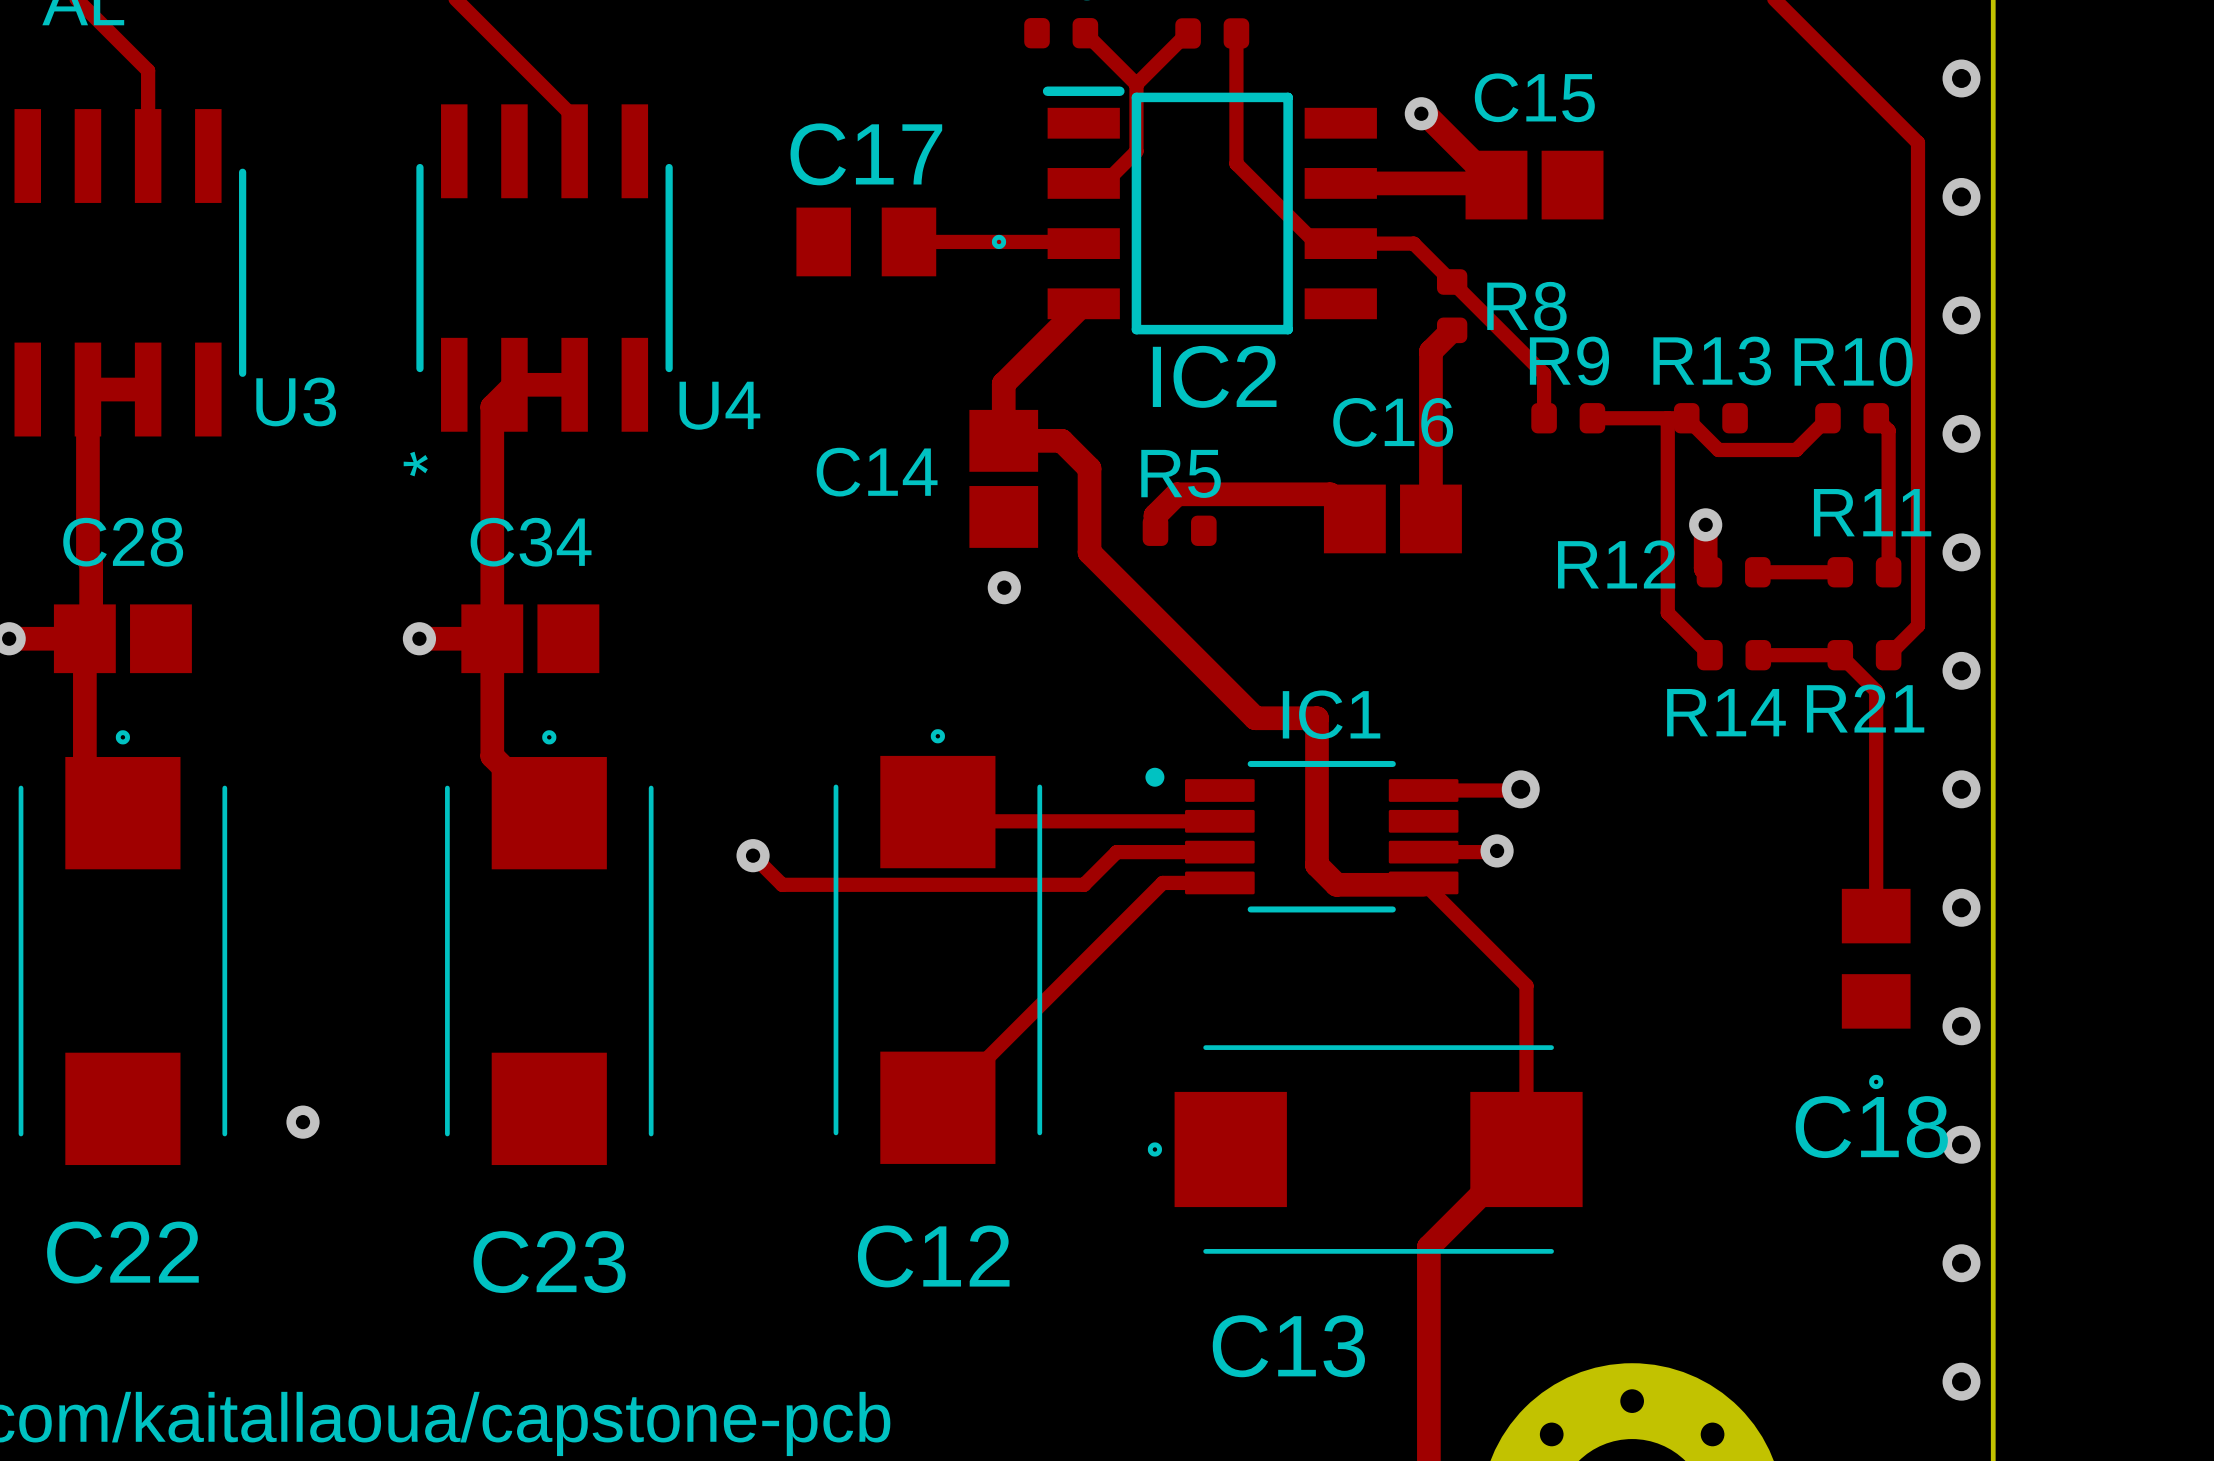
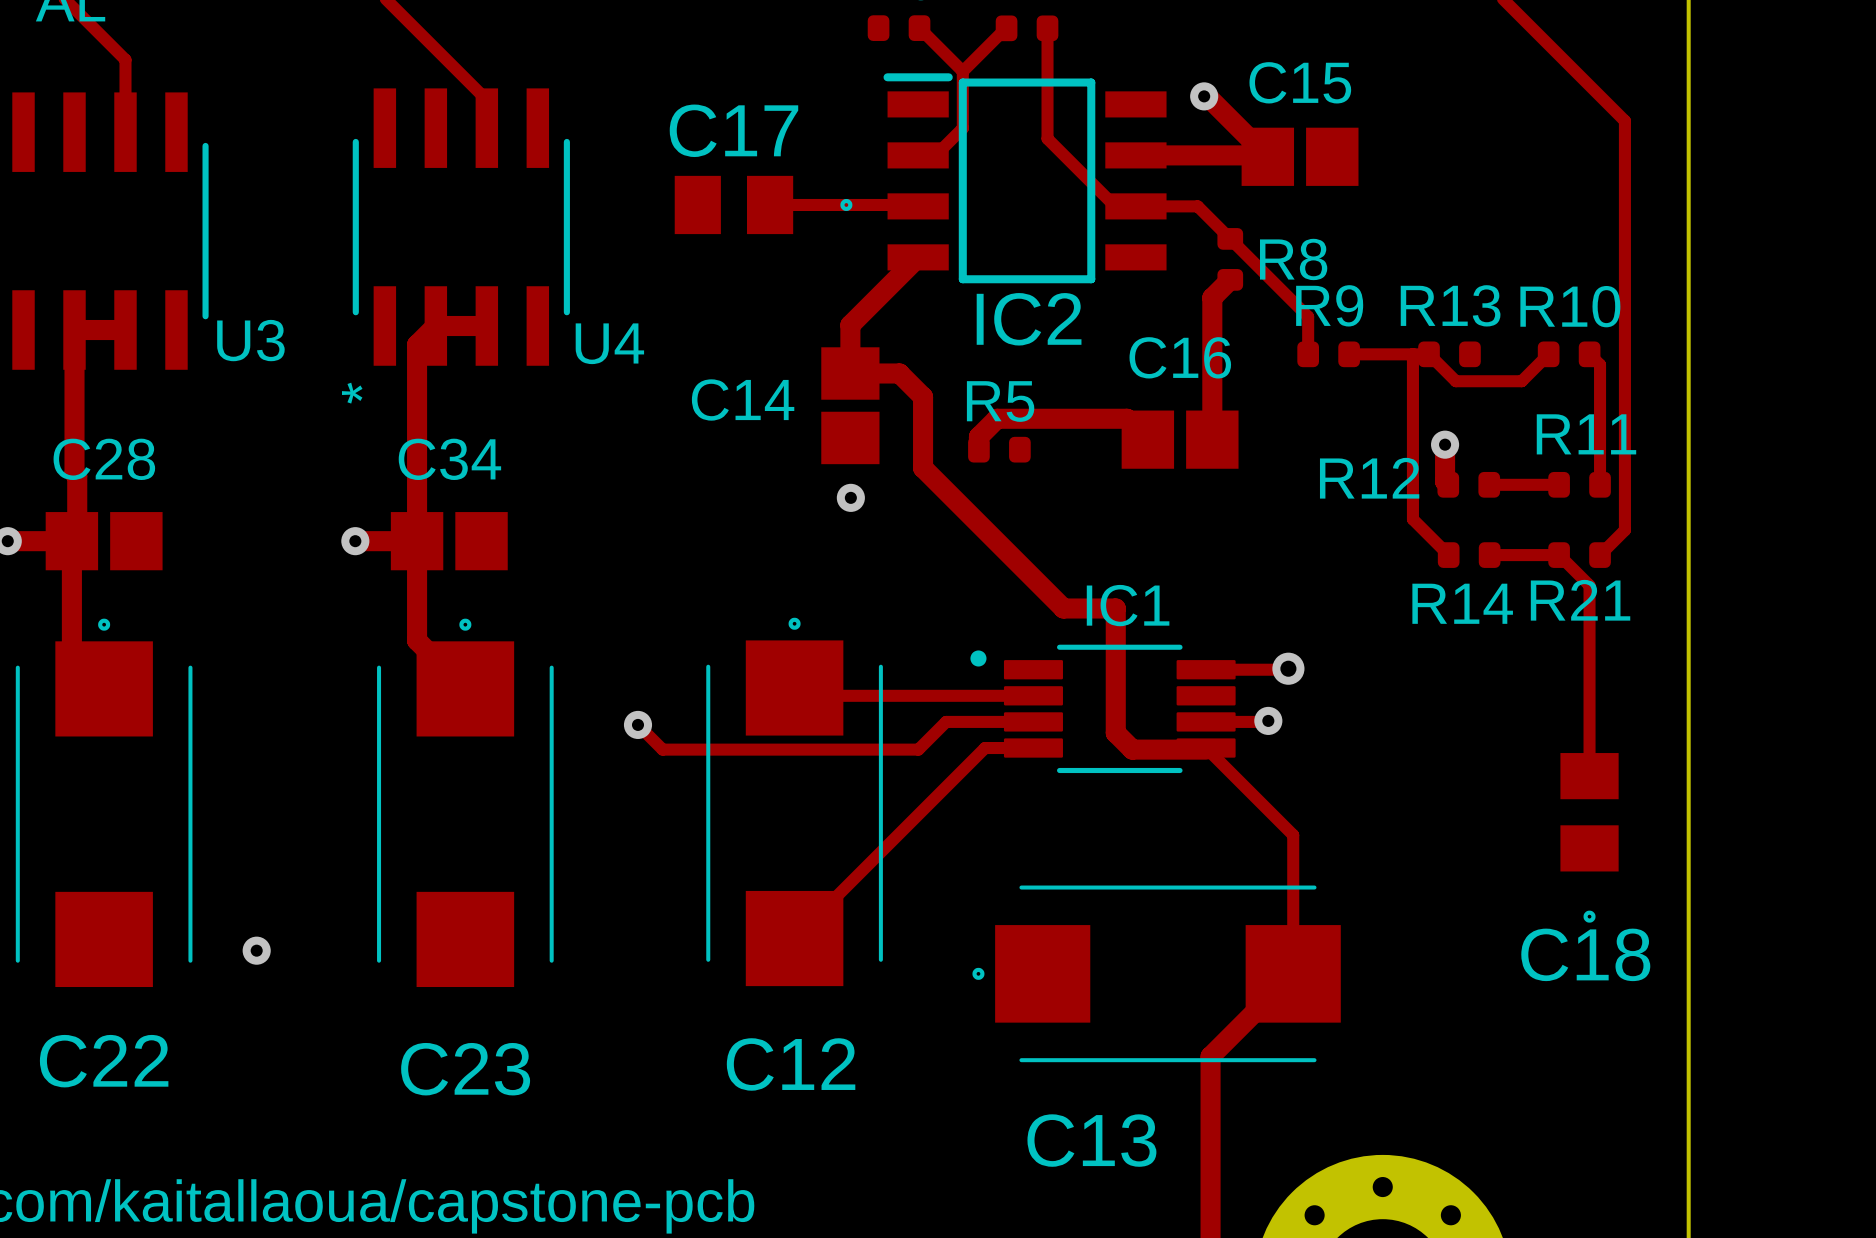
via: (1961, 78) -> none
via: (1961, 196) -> none
via: (1961, 315) -> none
via: (1961, 433) -> none
via: (1961, 552) -> none
via: (1961, 670) -> none
via: (1961, 789) -> none
via: (1961, 907) -> none
via: (1961, 1026) -> none
via: (1961, 1144) -> none
via: (1961, 1263) -> none
via: (1961, 1381) -> none

